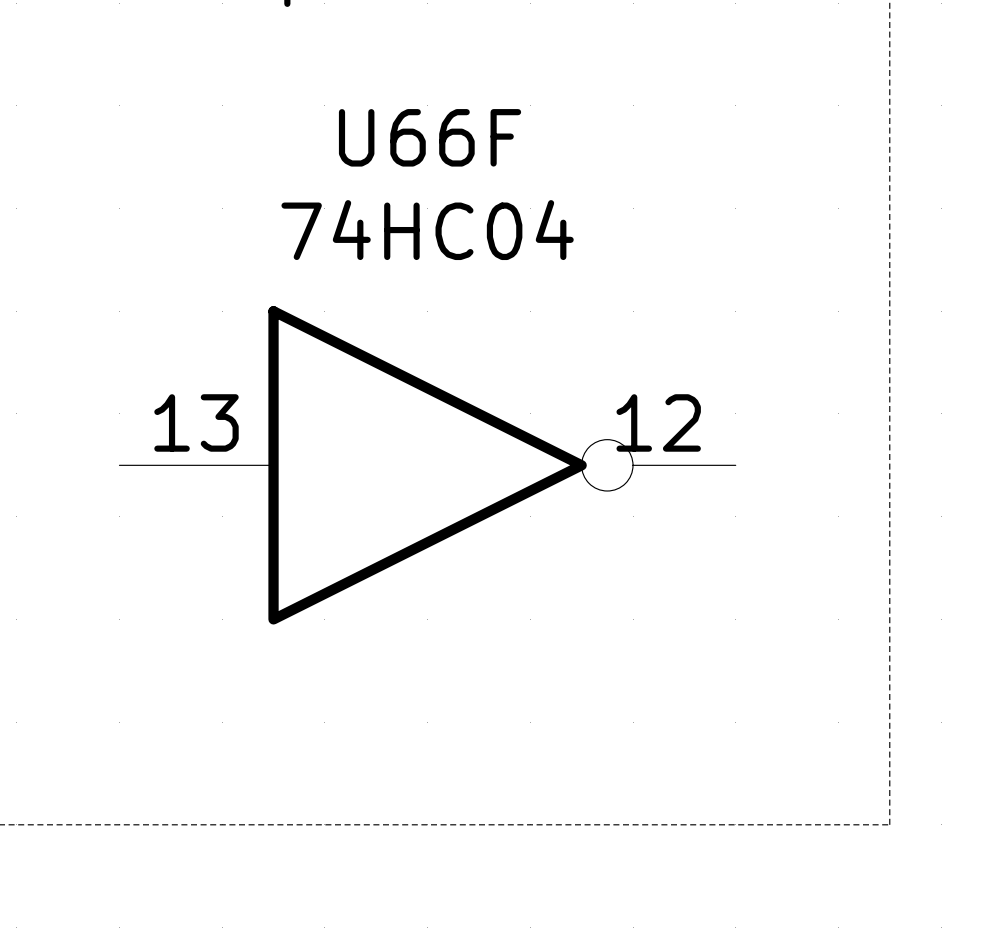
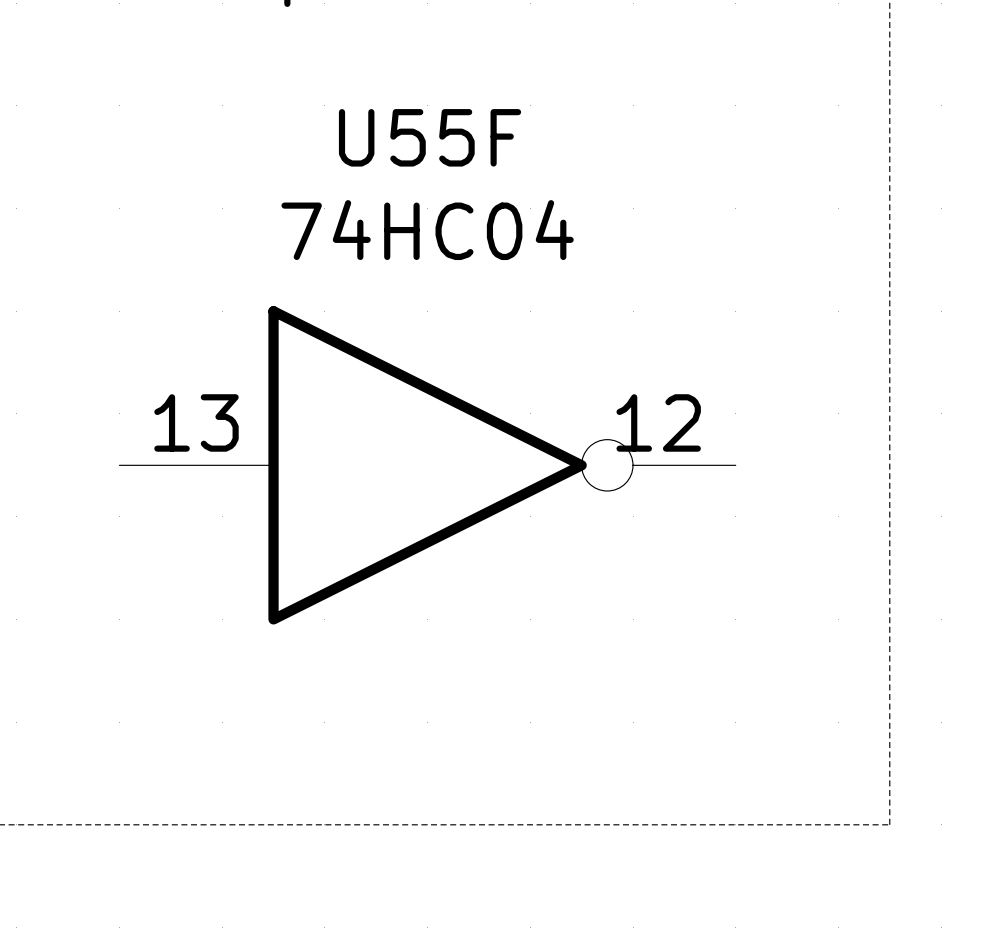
U66F name: U66F (430, 137) -> U55F (430, 137)

